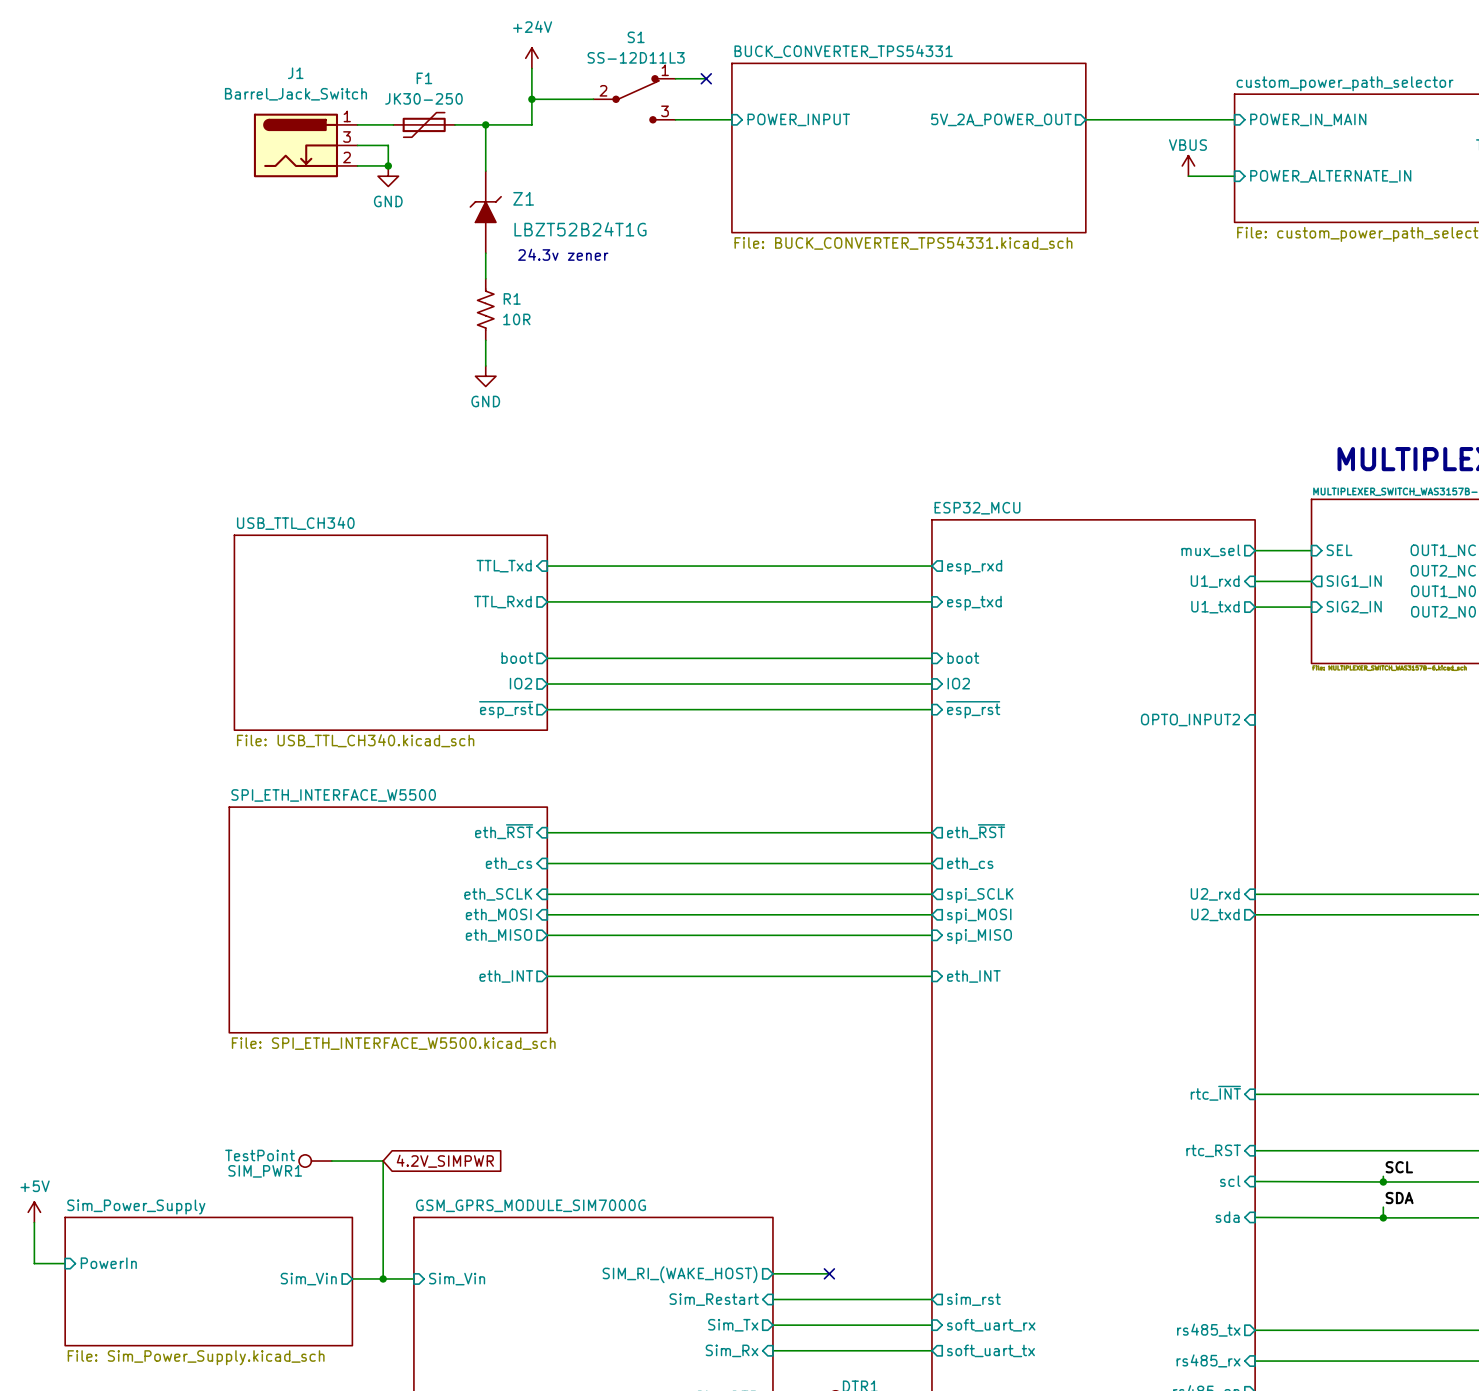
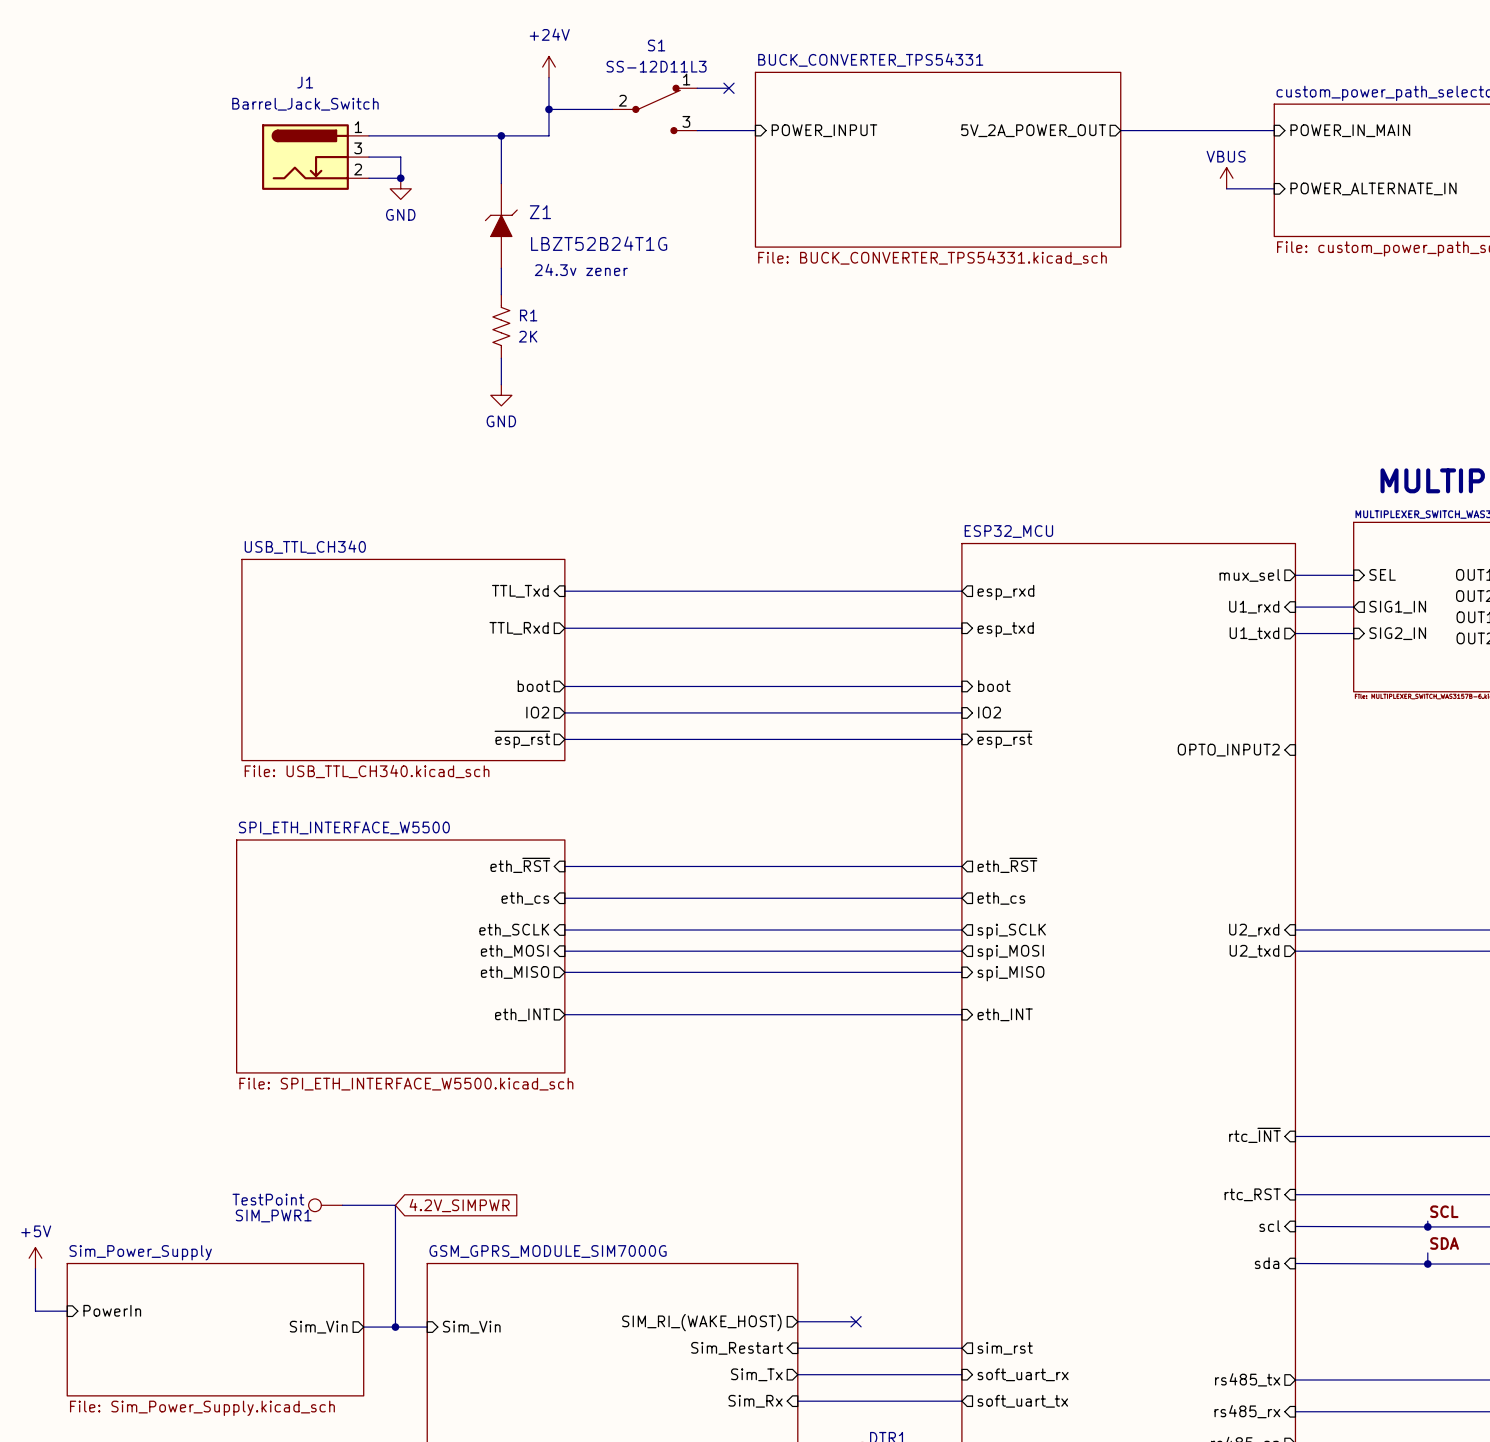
F1: JK30-250 (424, 124) -> none
R1 value: 10R (516, 319) -> 2K (528, 336)

